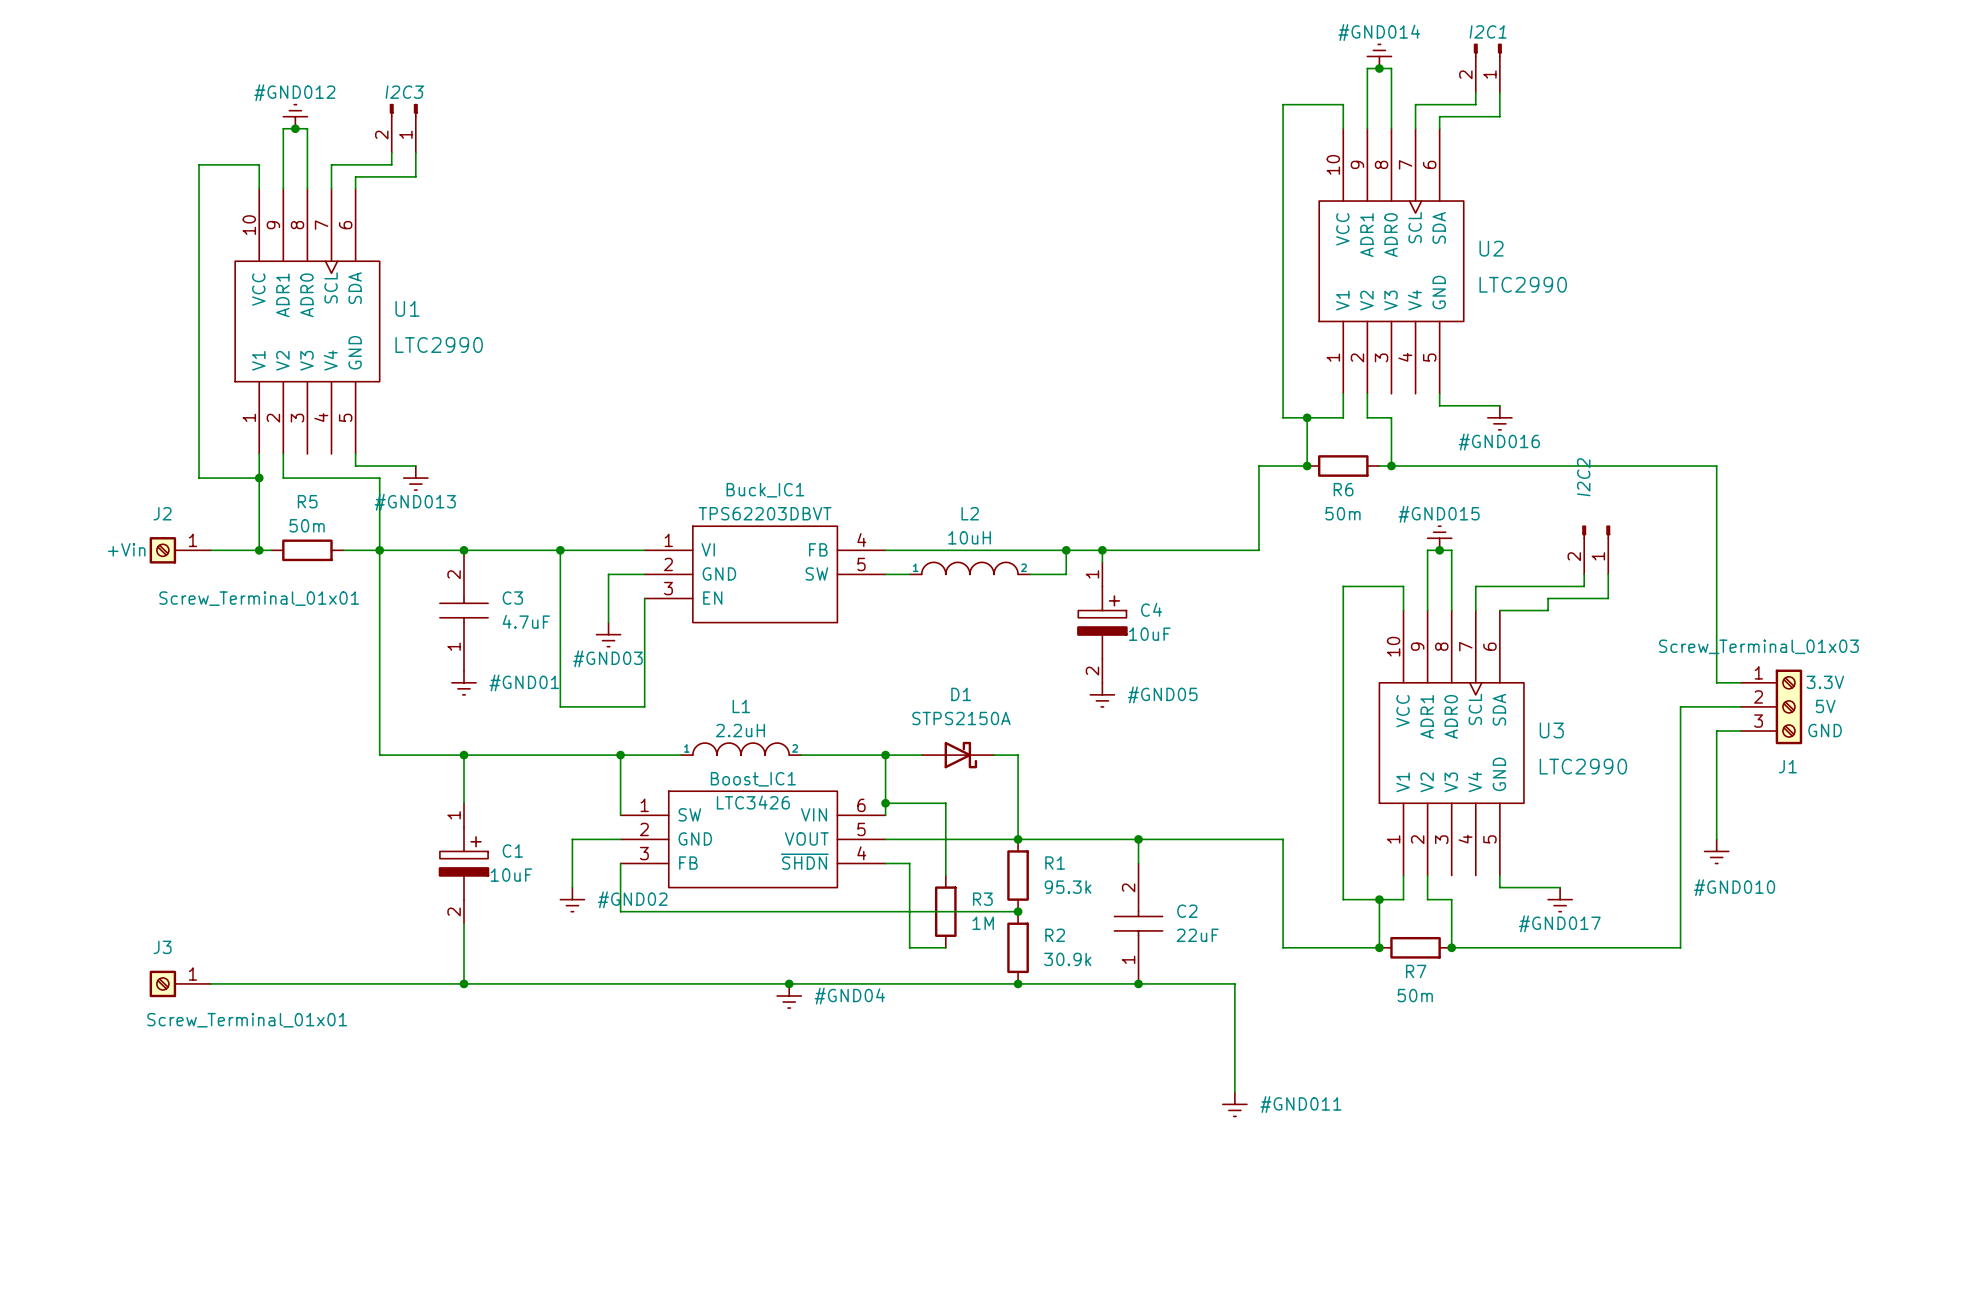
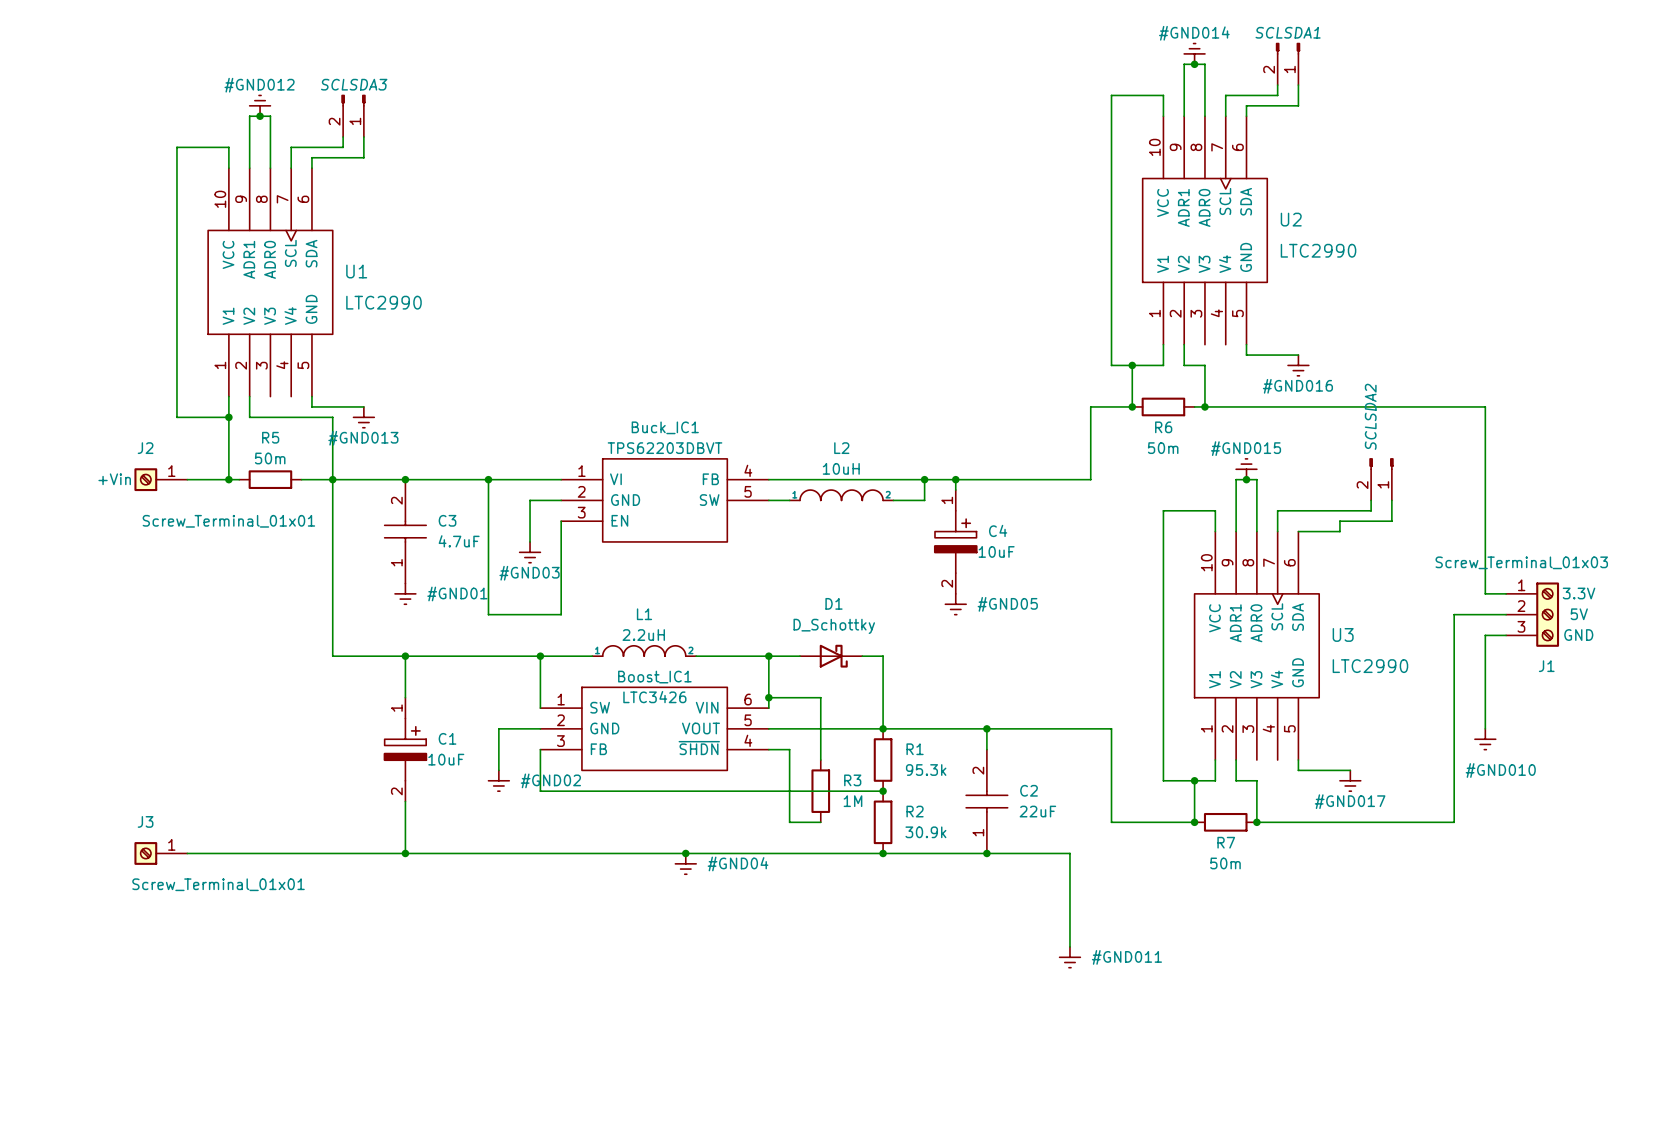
I2C1 name: I2C1 (1488, 31) -> SCLSDA1 (1288, 32)
I2C3 name: I2C3 (404, 92) -> SCLSDA3 (354, 84)
I2C2 name: I2C2 (1583, 477) -> SCLSDA2 (1370, 416)
D1 value: STPS2150A (961, 718) -> D_Schottky (834, 626)

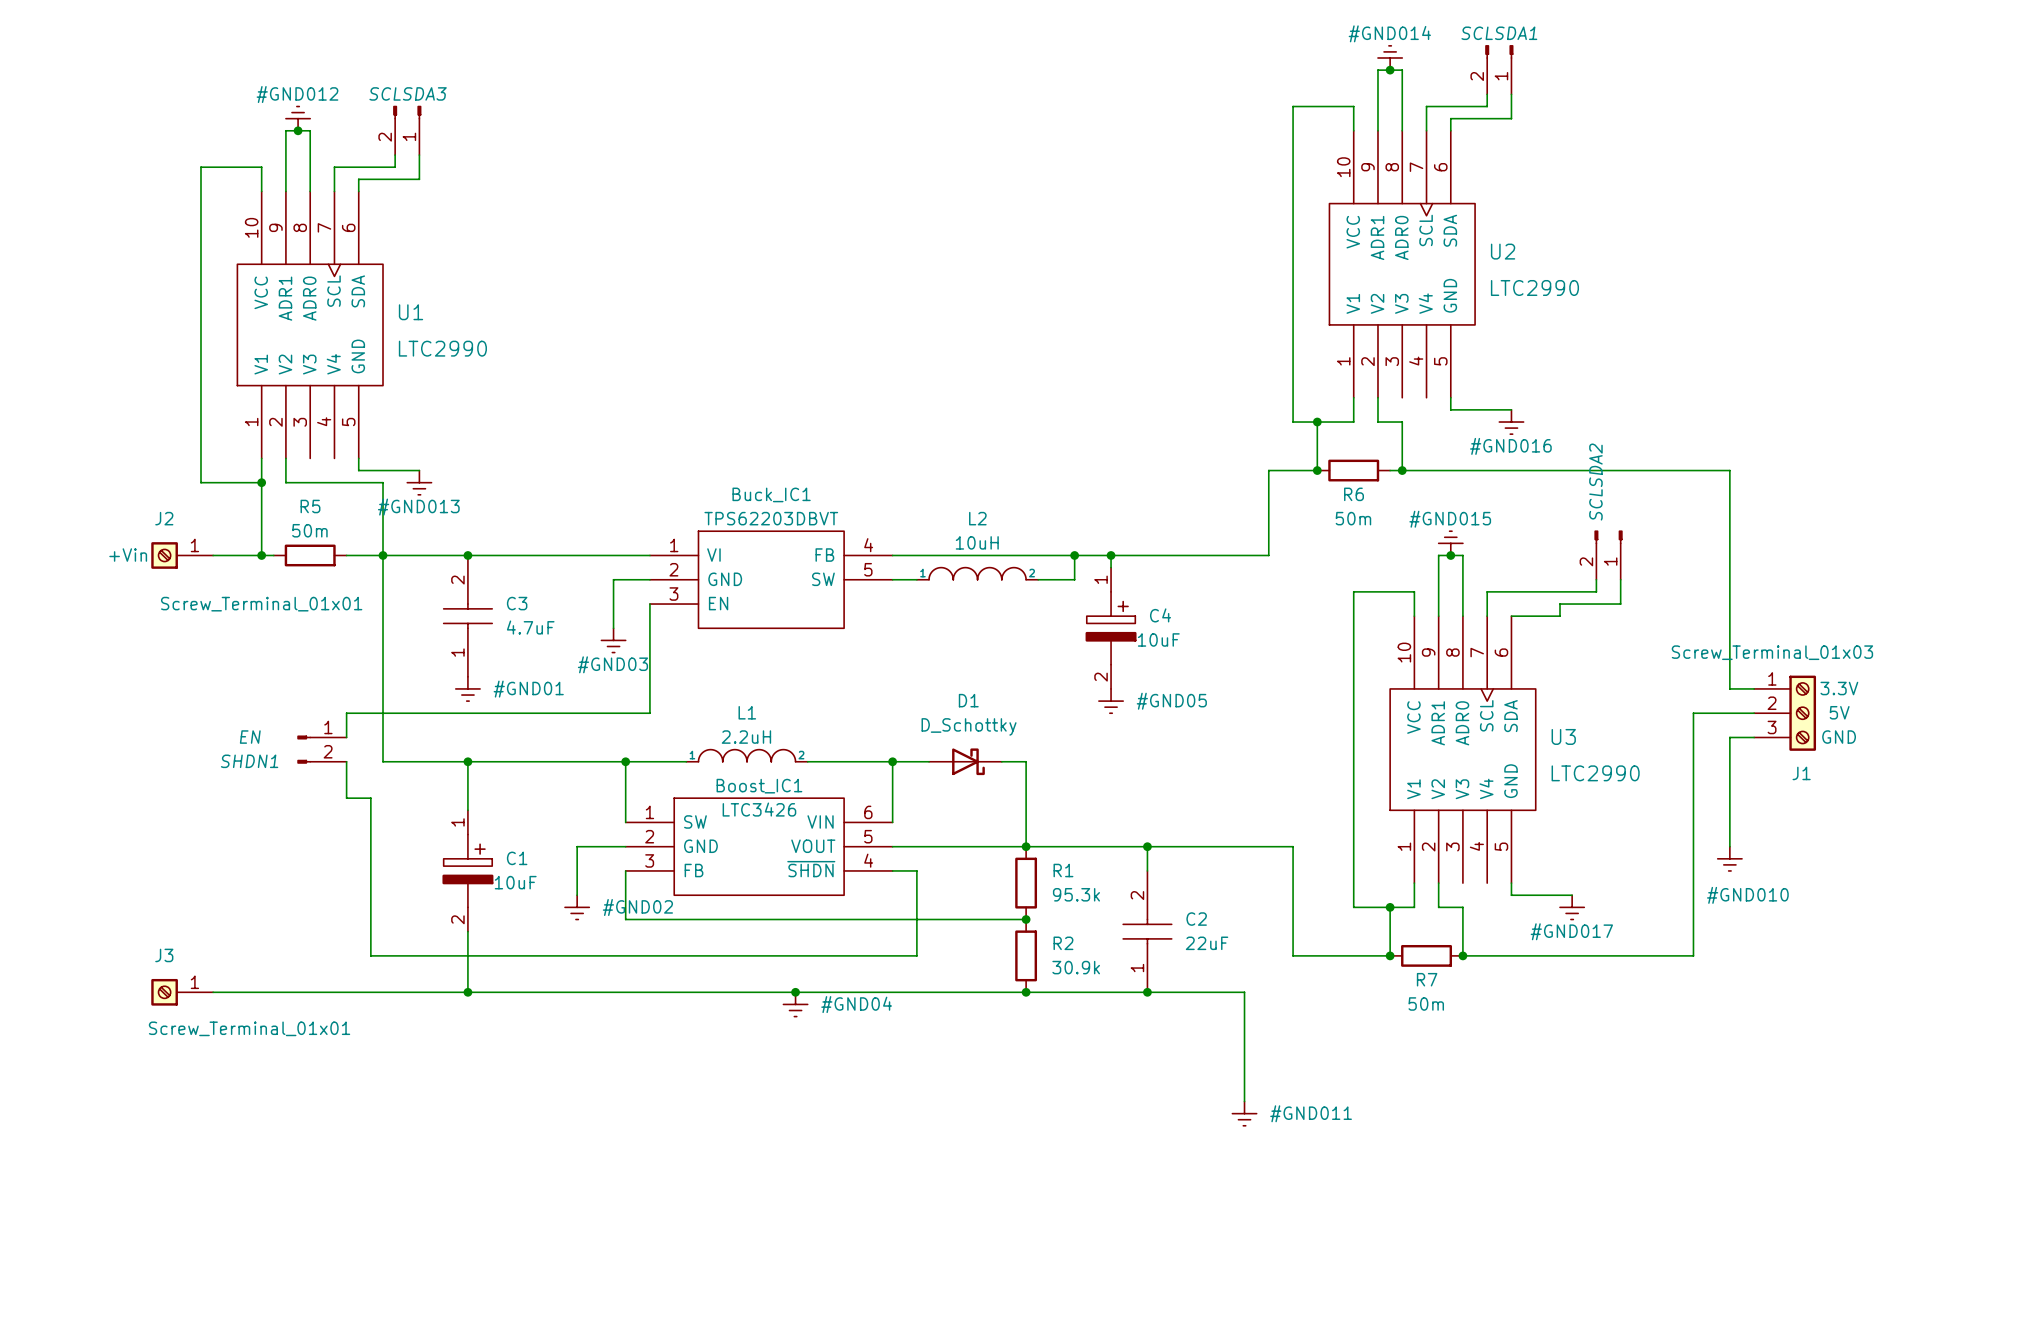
wire: (488, 479) (488, 614) -> (346, 737) (346, 713) (565, 713)
junction: (488, 479) -> none
SHDN1: none -> EN (321, 749)
wire: (768, 697) (820, 697) (820, 760) -> none
junction: (768, 697) -> none
R3: 1M (820, 791) -> none
wire: (789, 822) (820, 822) -> (916, 955) (370, 955) (370, 798) (346, 798) (346, 761)

